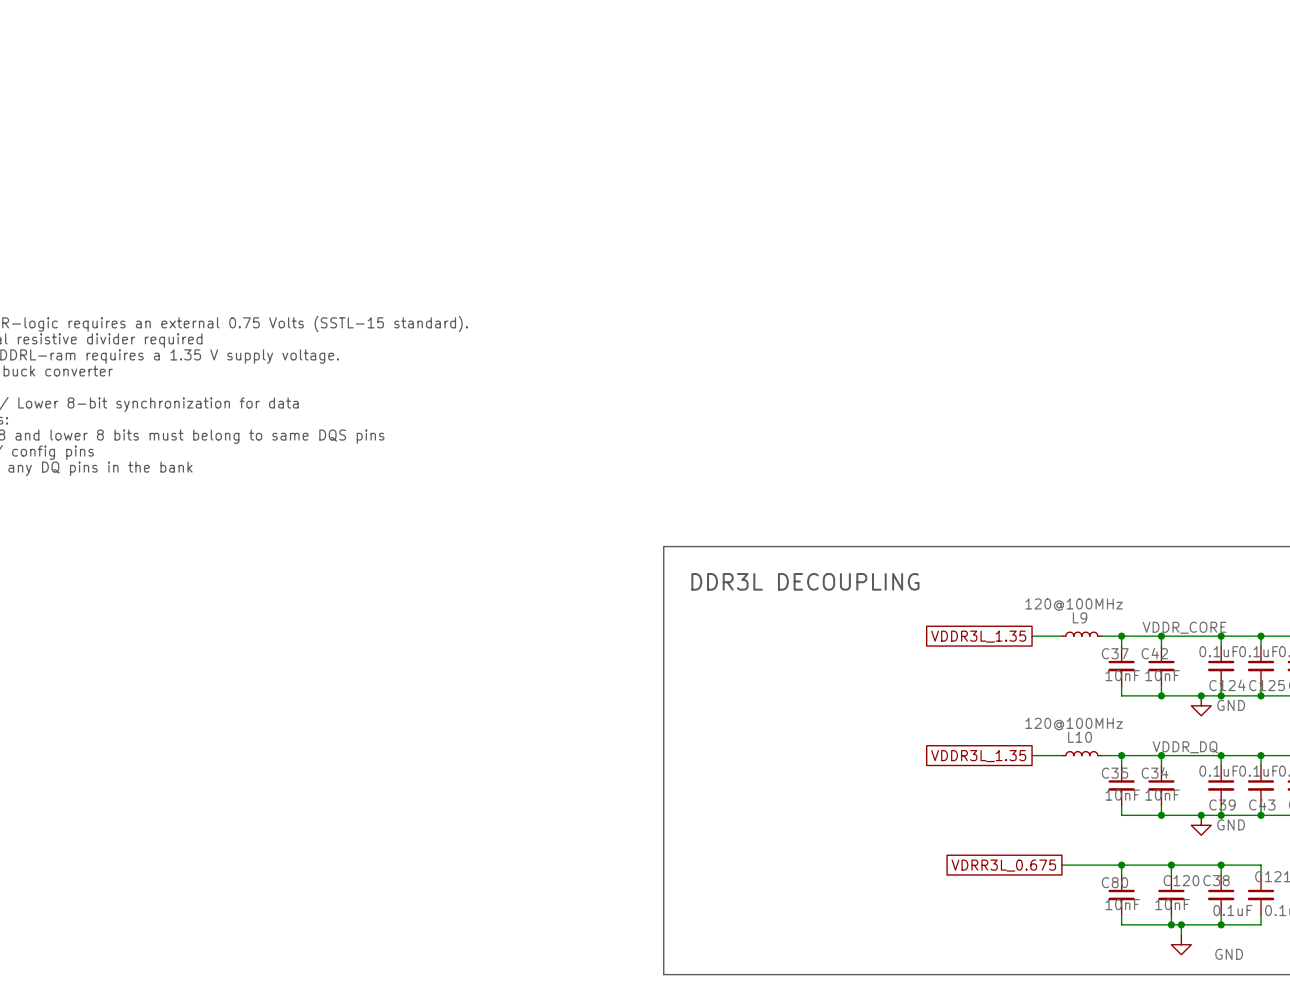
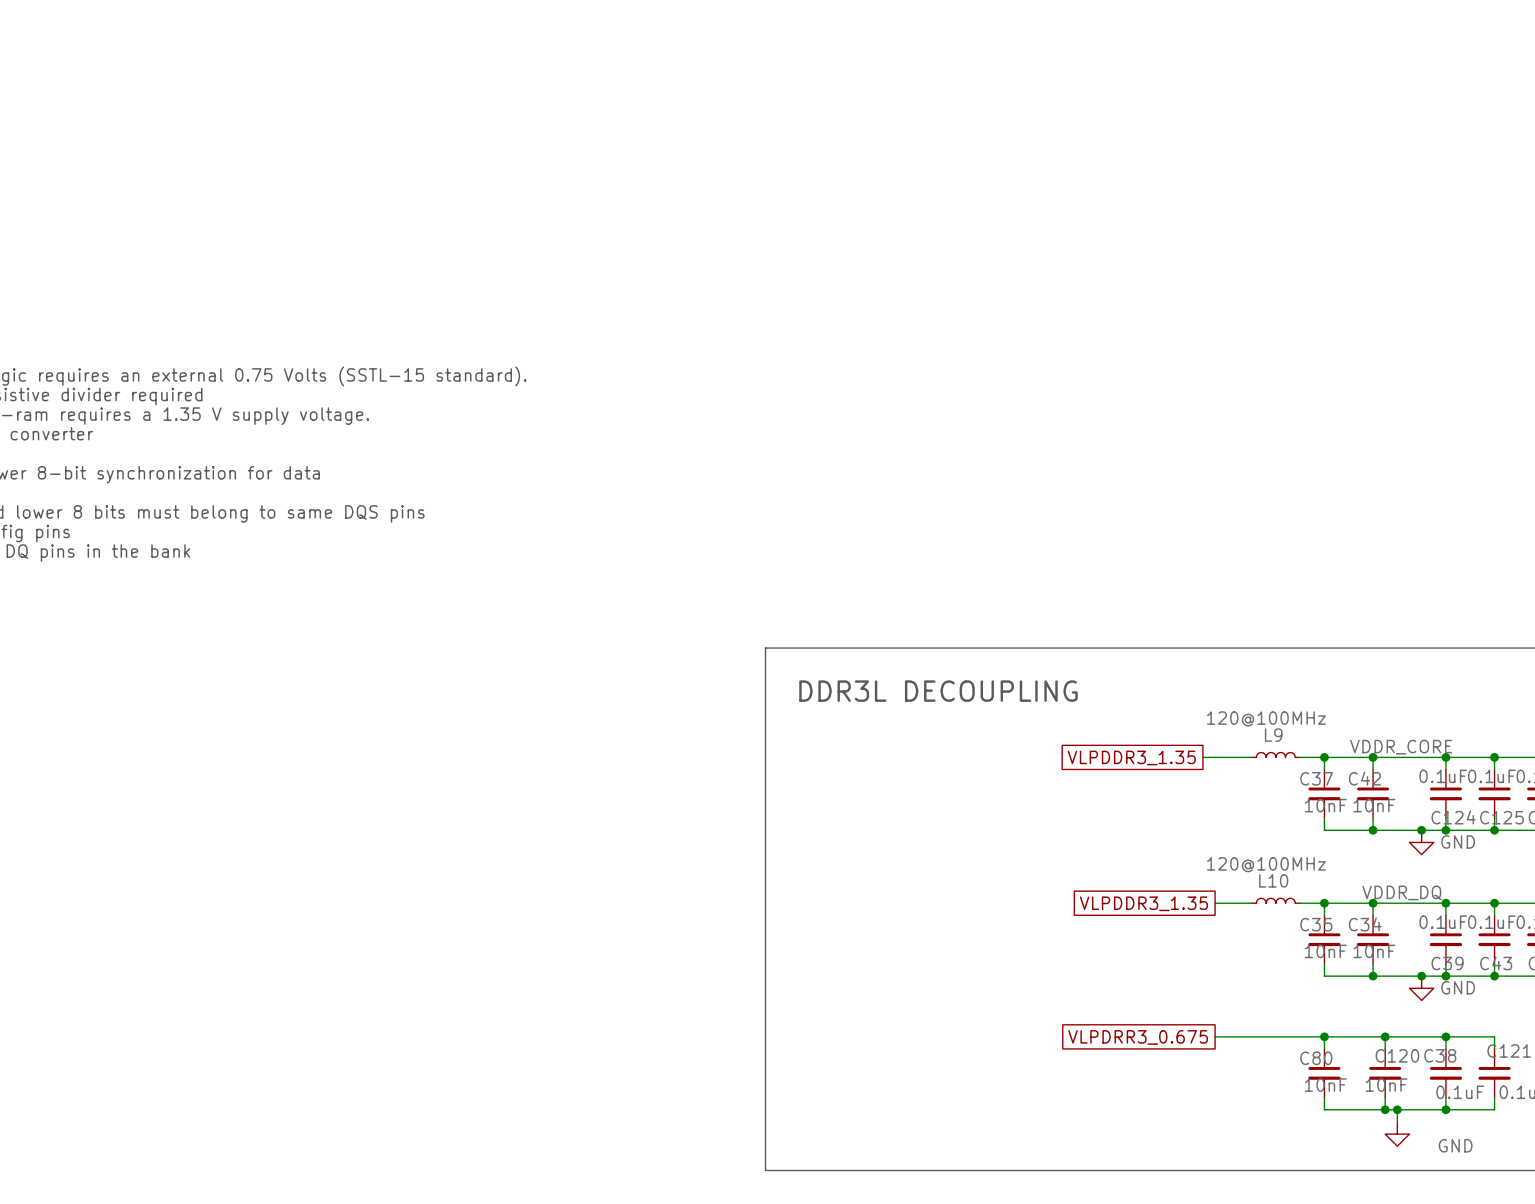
global label: VDDR3L_1.35 (978, 636) -> VLPDDR3_1.35 (1131, 757)
wire: none -> (1202, 757) (1215, 757)
global label: VDDR3L_1.35 (978, 756) -> VLPDDR3_1.35 (1143, 903)
global label: VDRR3L_0.675 (1003, 865) -> VLPDRR3_0.675 (1138, 1037)
wire: none -> (1215, 1036) (1251, 1036)

